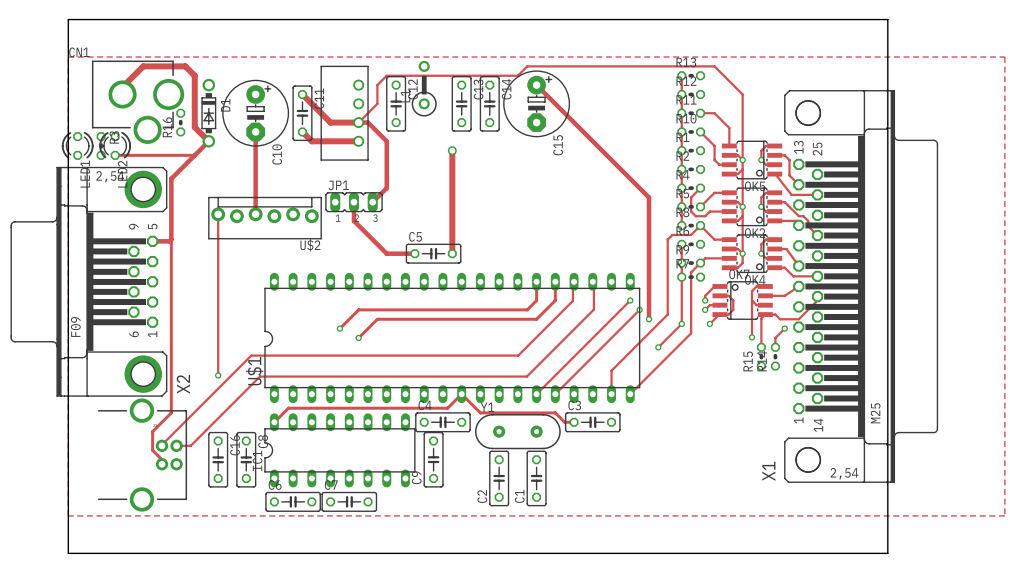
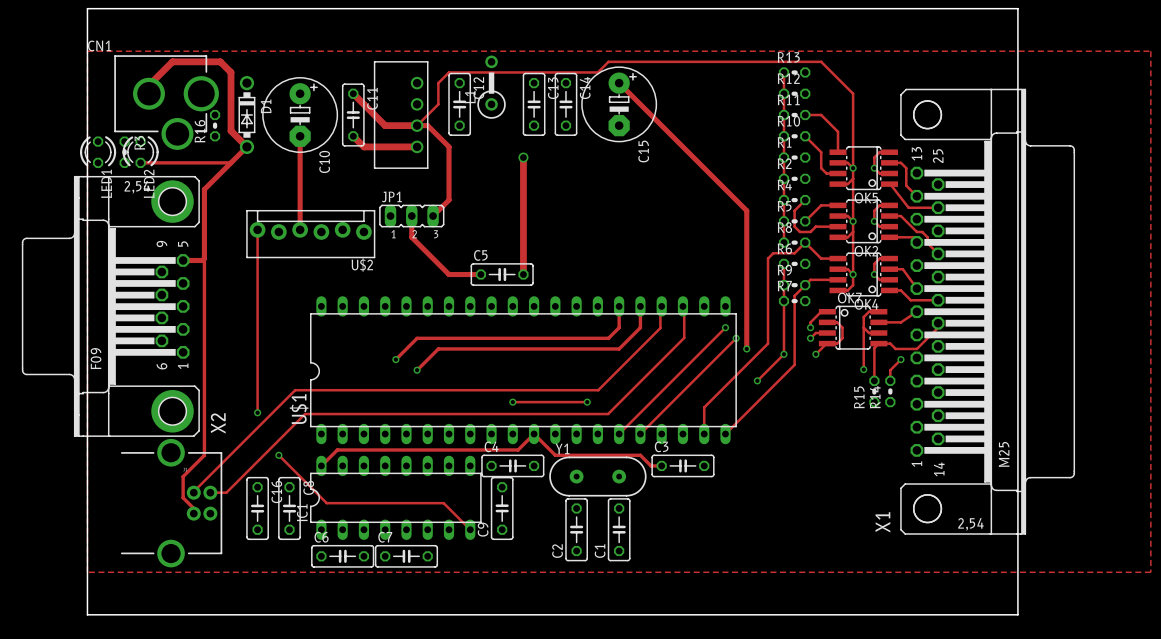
track: none -> (512, 402) (587, 402)
via: none -> (512, 402)
via: none -> (587, 402)
track: none -> (278, 455) (326, 503) (443, 503) (470, 529)
via: none -> (278, 455)

